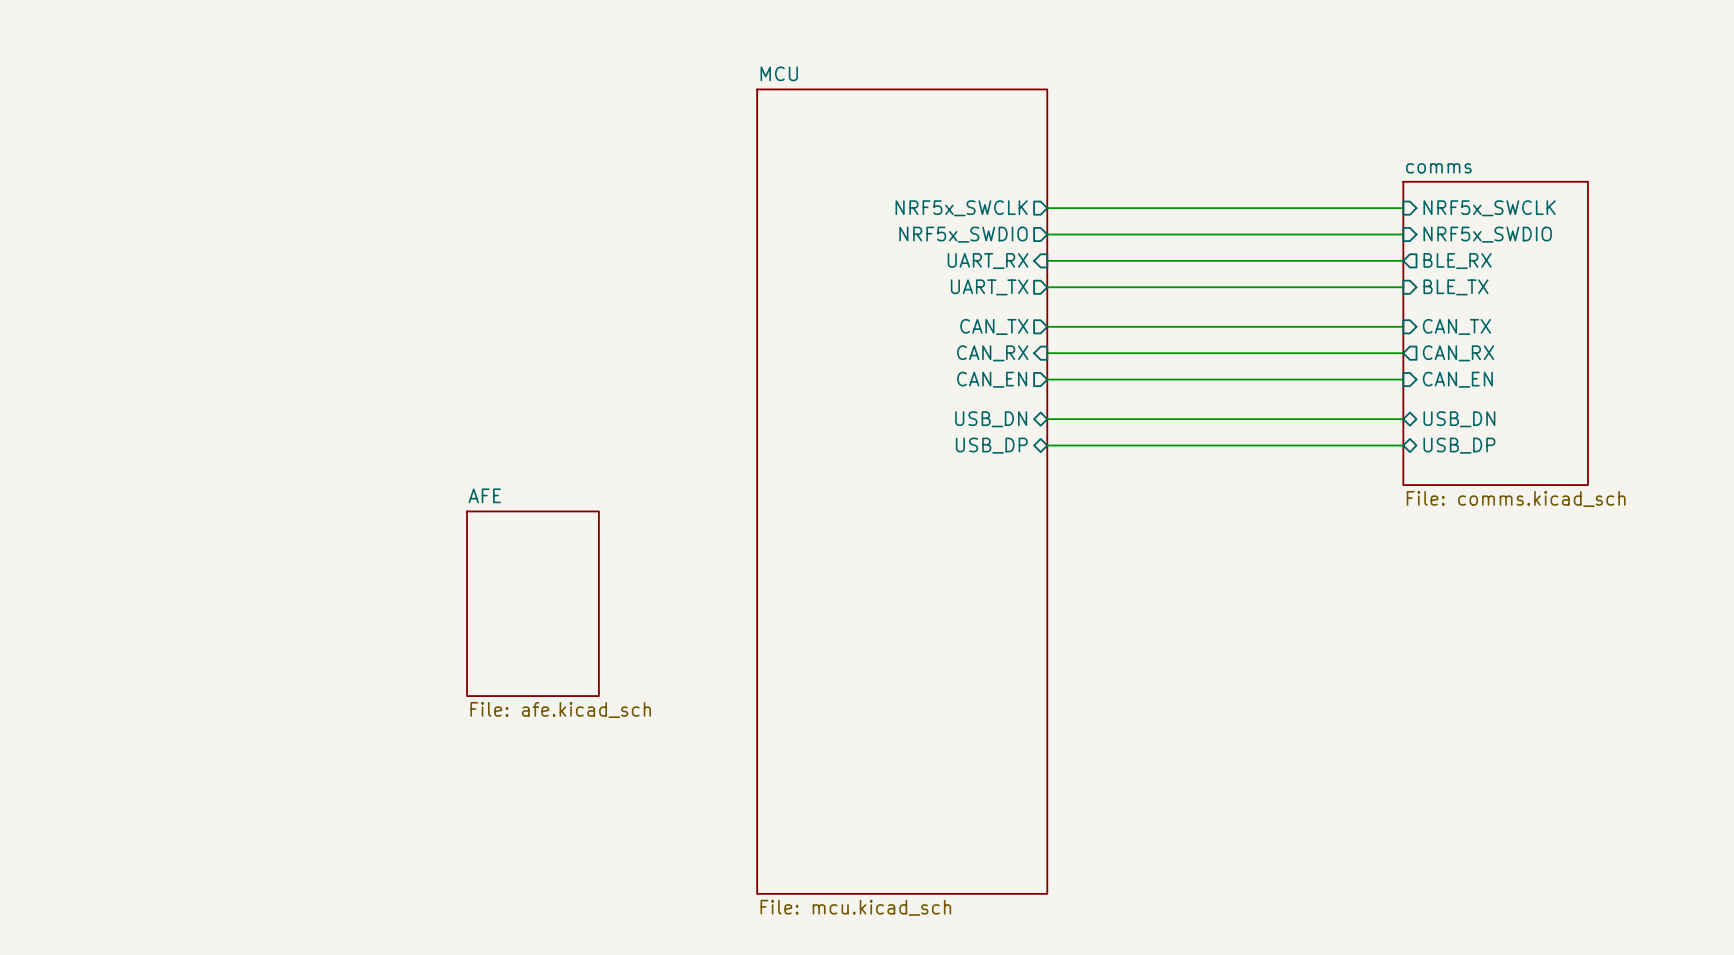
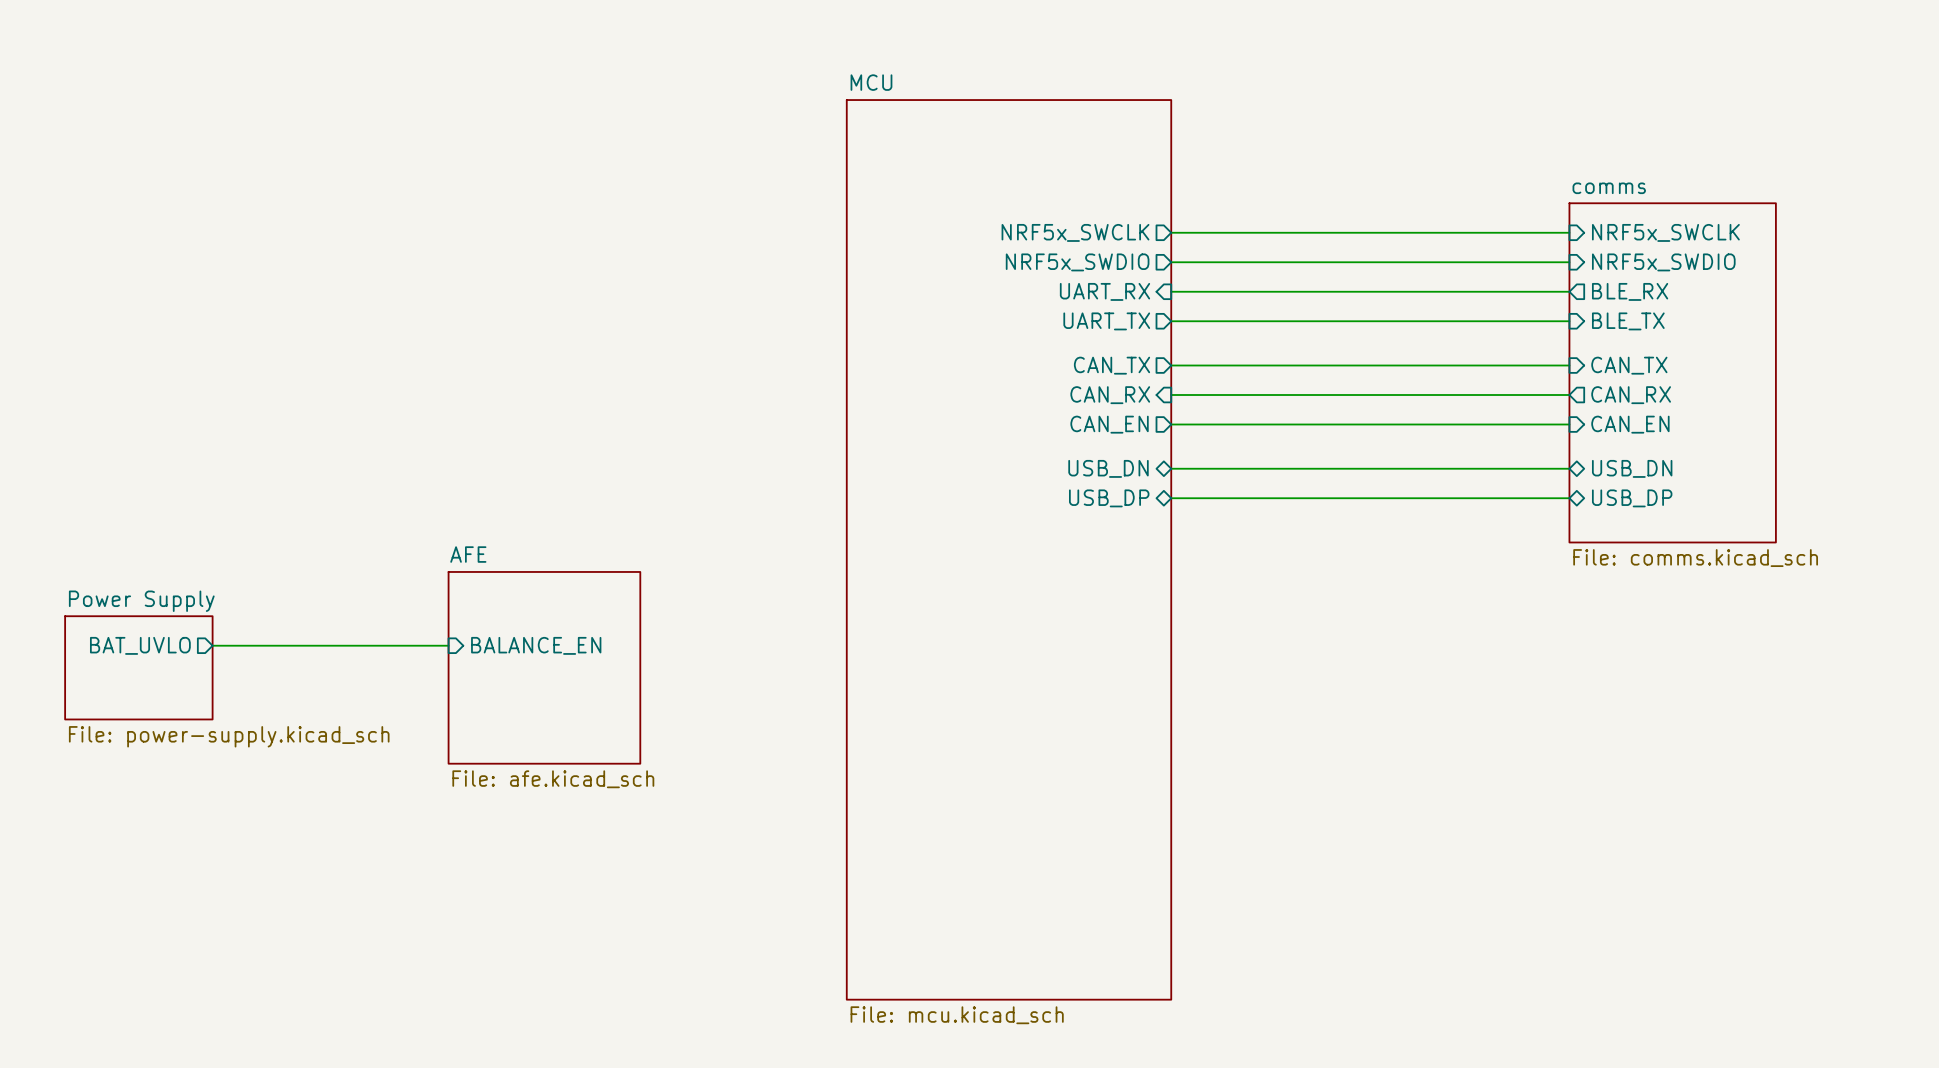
sheet pin: none -> BAT_UVLO (140, 645)
wire: none -> (212, 645) (448, 645)
sheet pin: none -> BALANCE_EN (536, 645)
sheet Power Supply: none -> File: power-supply.kicad_sch (138, 667)
sheet AFE: none -> File: afe.kicad_sch (544, 667)
sheet AFE: File: afe.kicad_sch (532, 603) -> none

